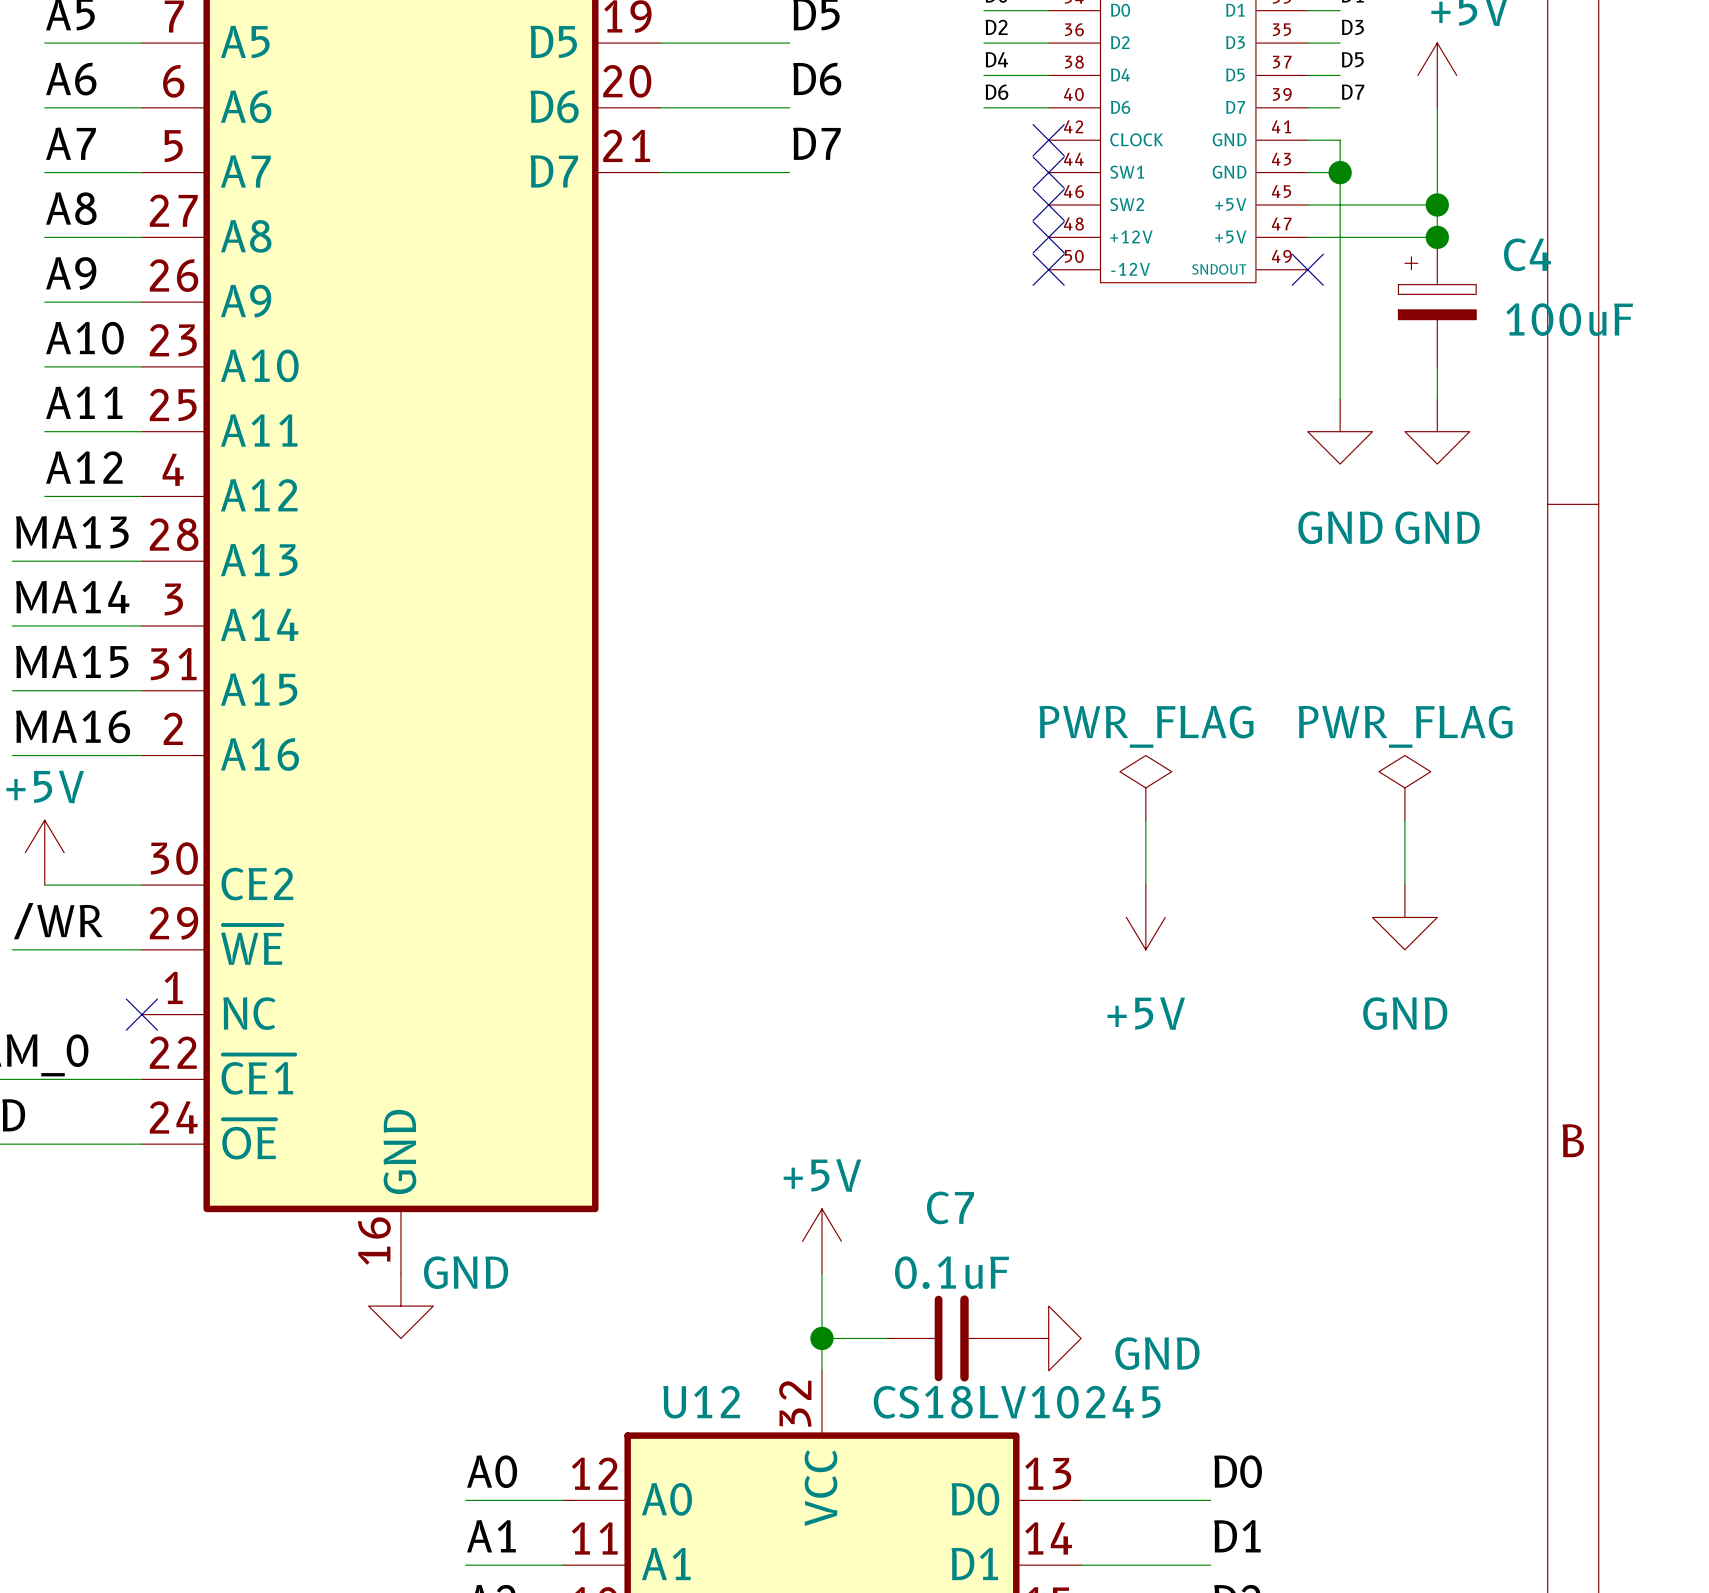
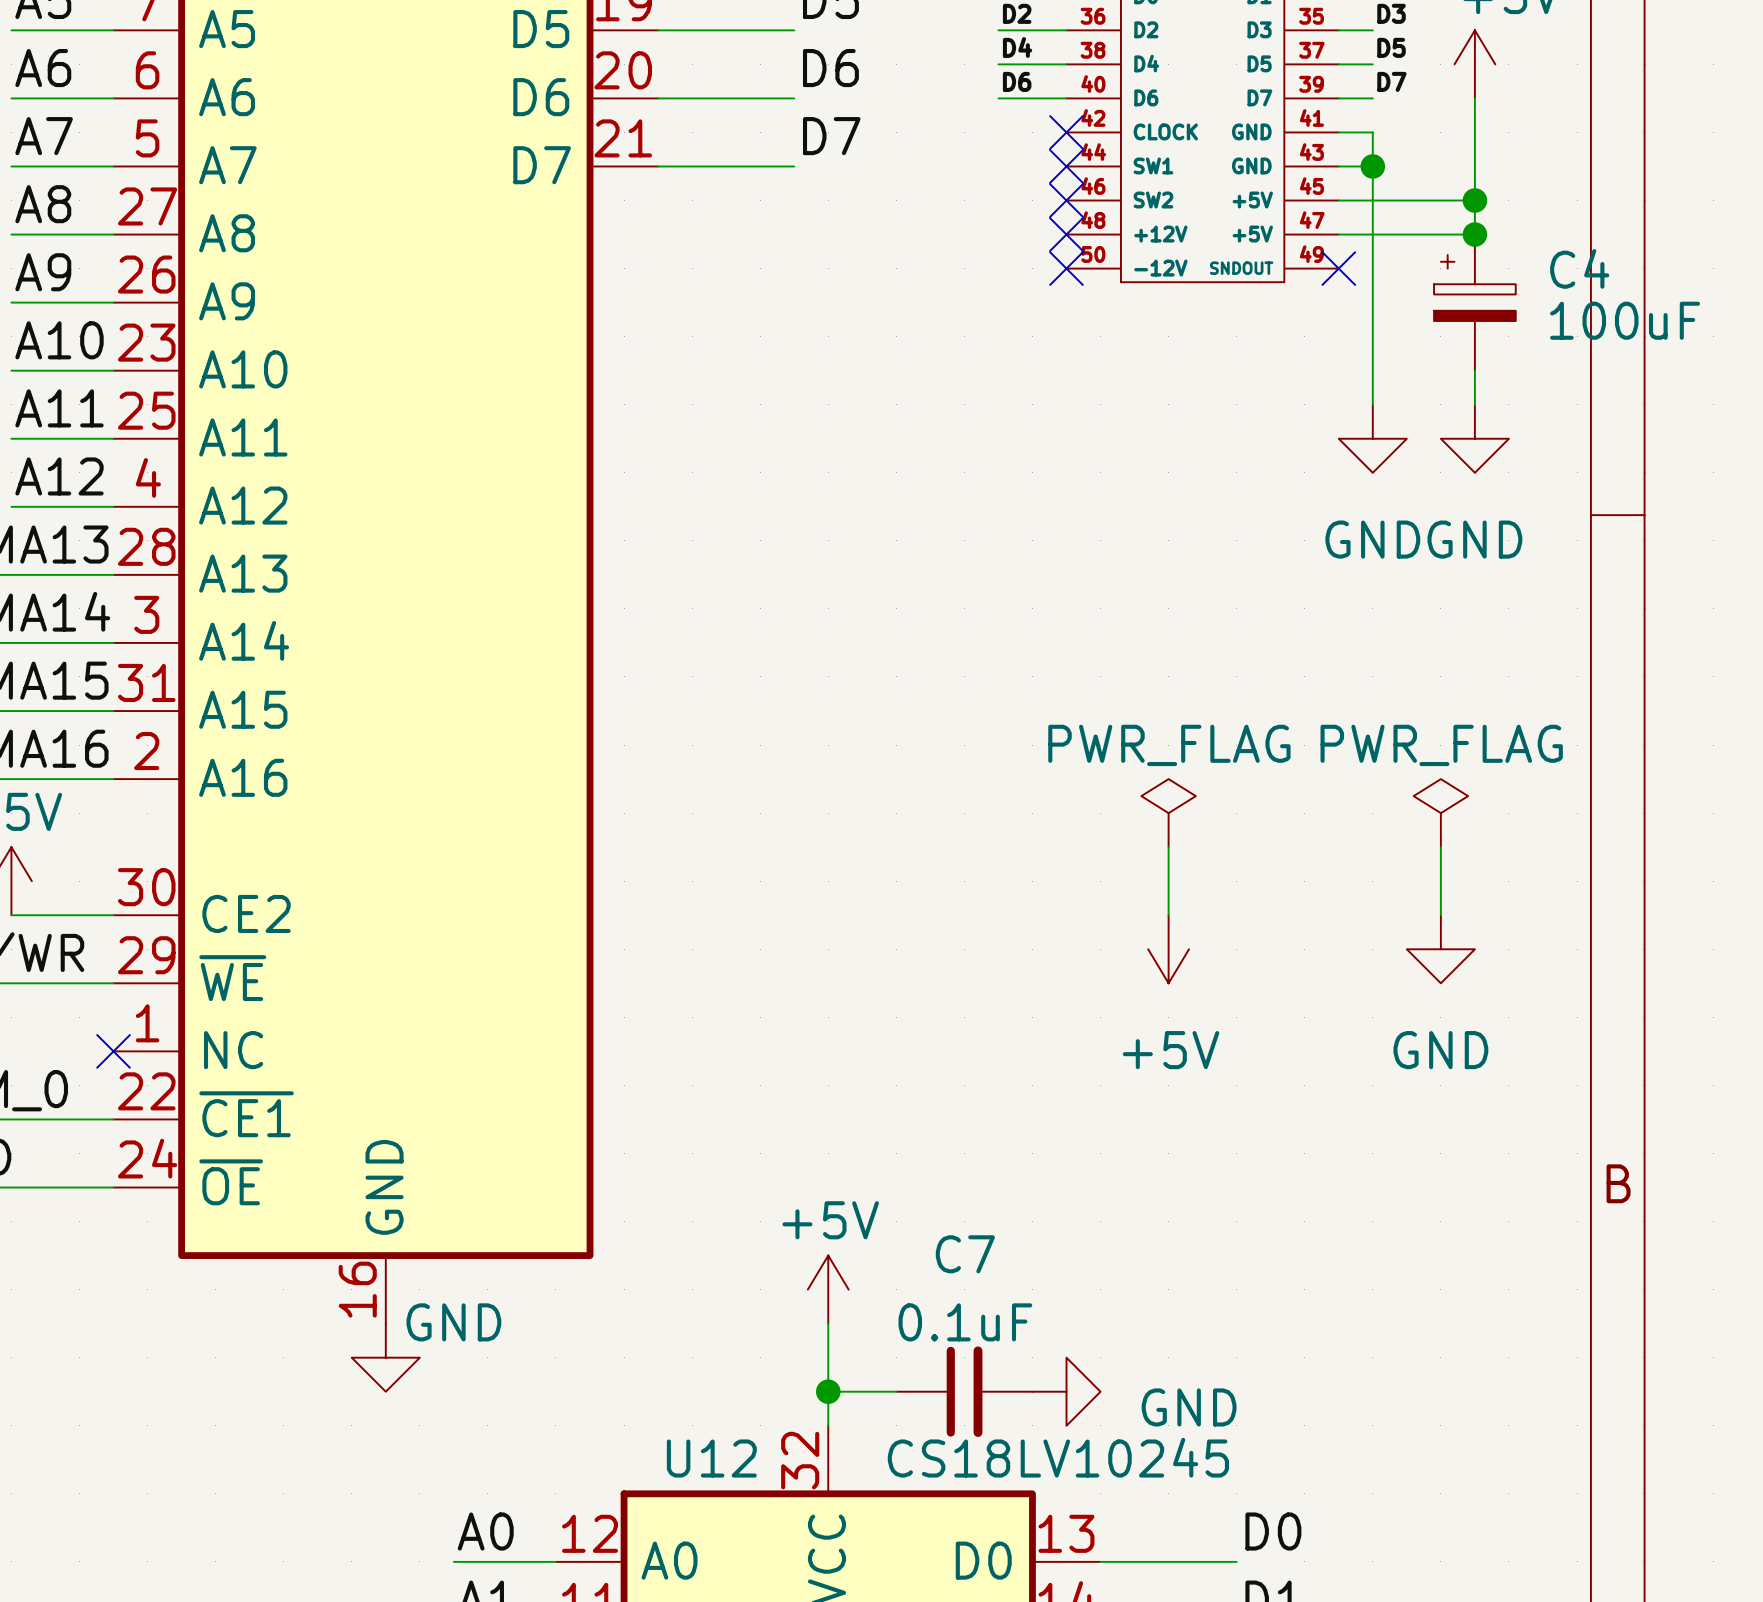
C4 name position: C4 (1527, 254) -> C4 (1579, 268)

